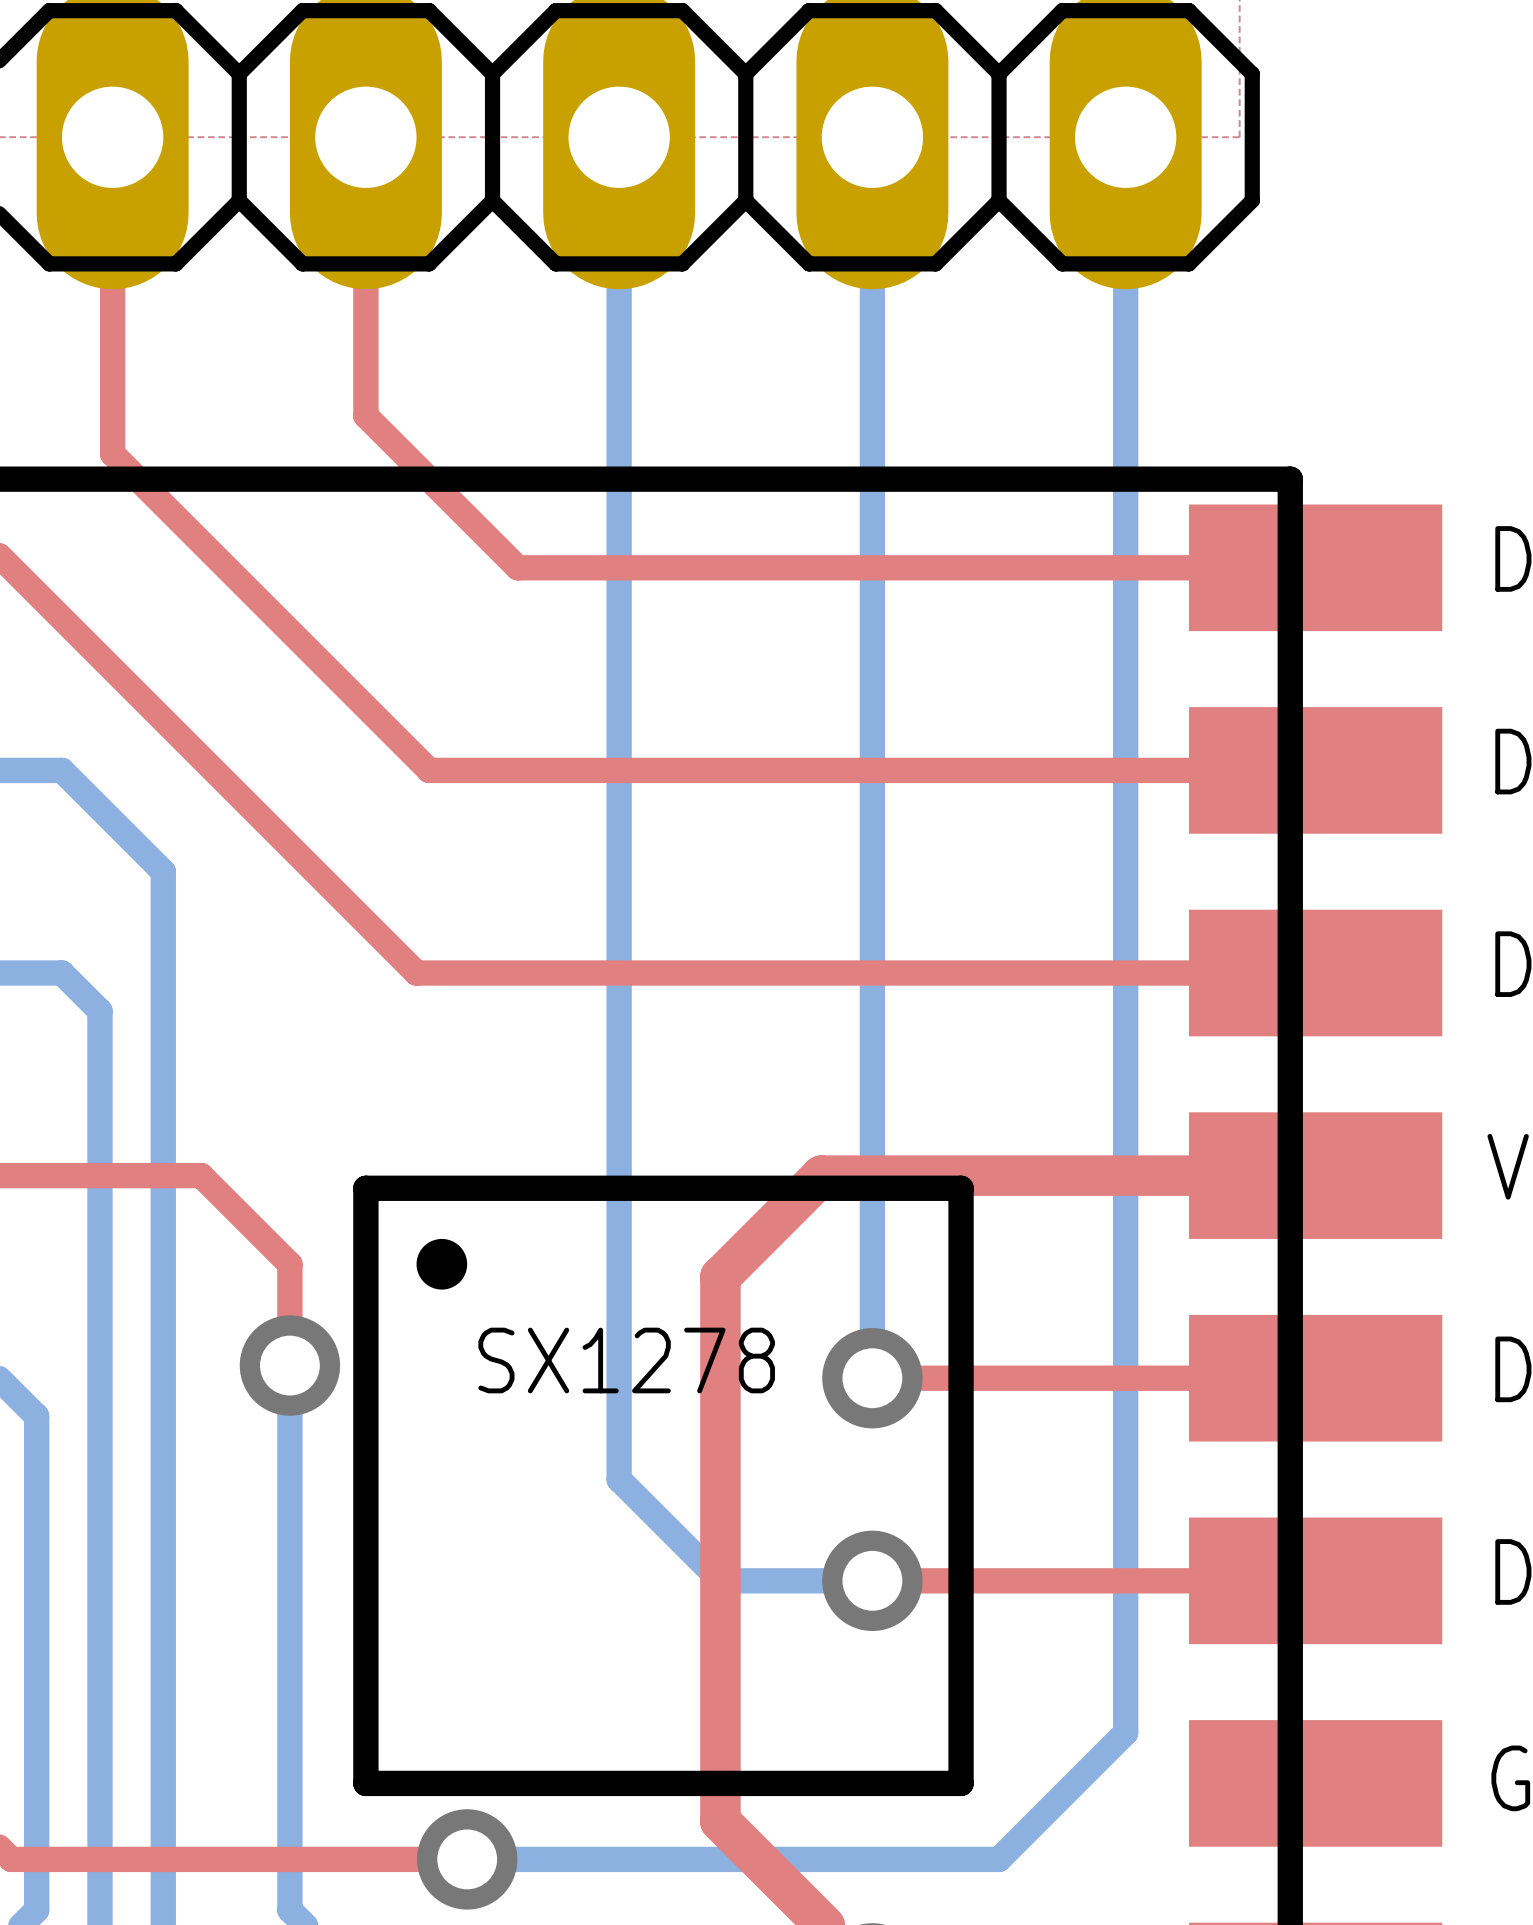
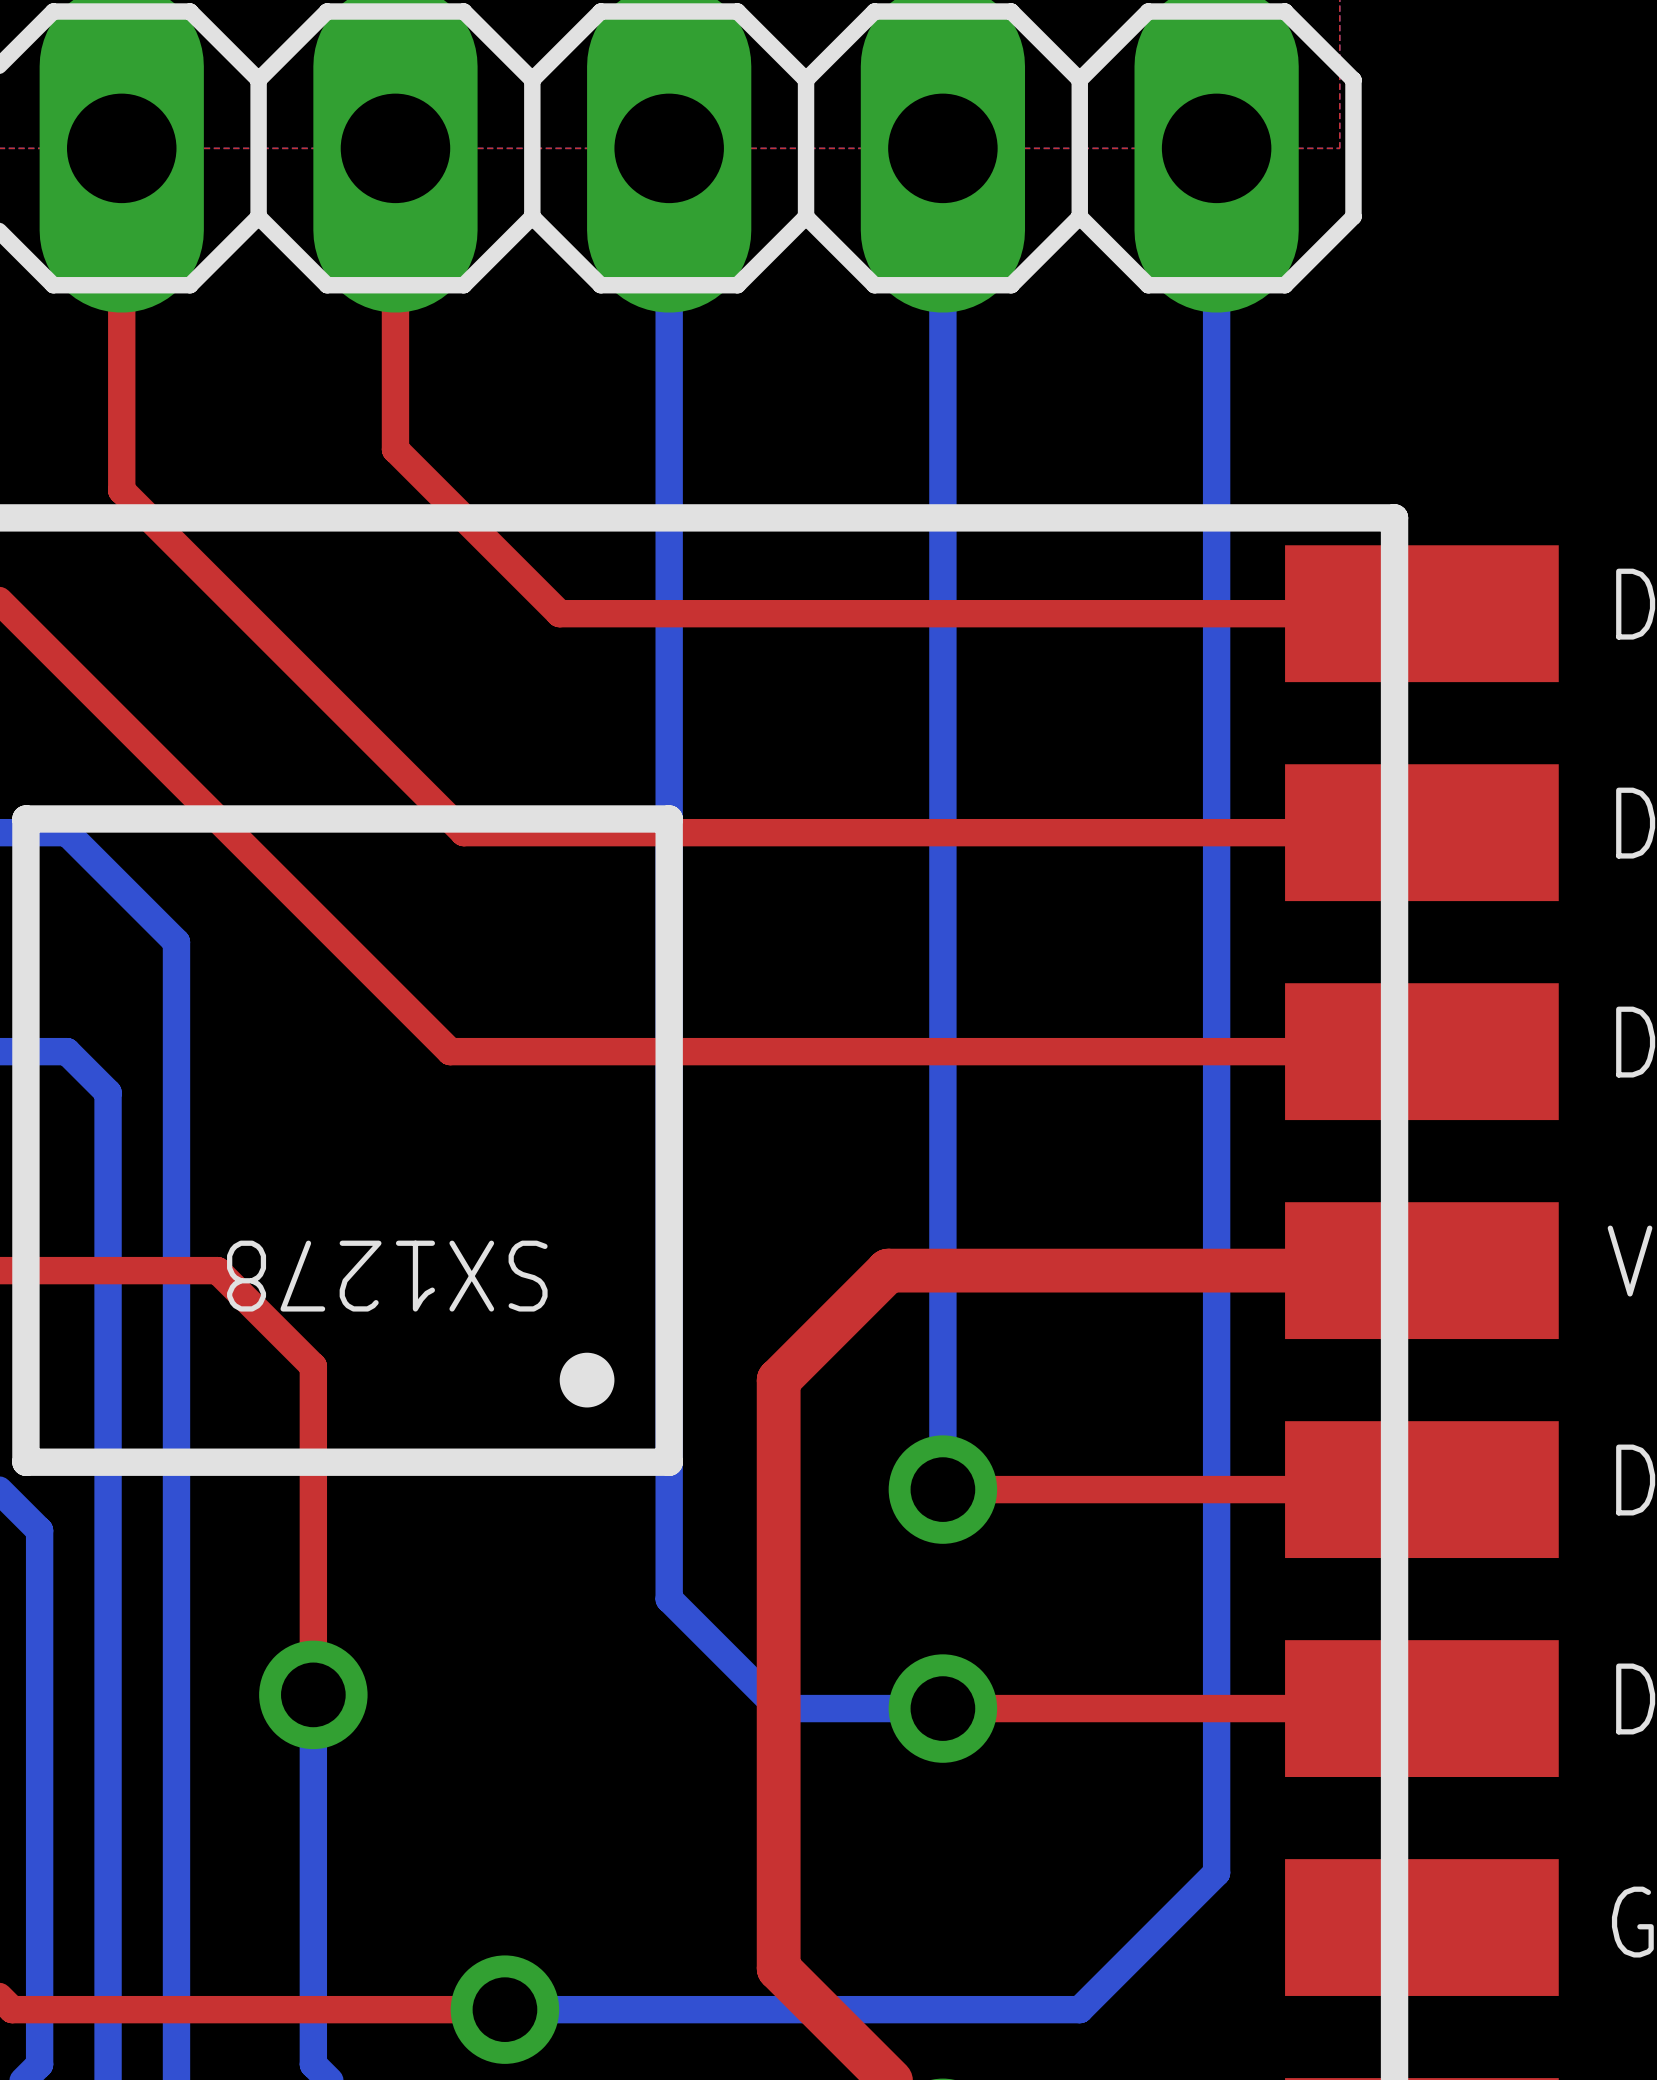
line: (365, 1188) (961, 1188) (961, 1783) (365, 1783) (365, 1188) -> (25, 818) (669, 818) (669, 1462) (25, 1462) (25, 818)
drawing position: (441, 1264) -> (587, 1380)
text rotation: 0° (626, 1360) -> 180° (387, 1276)
text position: SX1278 (626, 1360) -> SX1278 (387, 1276)
top track: none -> (313, 1475) (313, 1694)
bottom track: (289, 1365) (289, 1568) -> none
via: (289, 1365) -> none
via: none -> (313, 1694)

